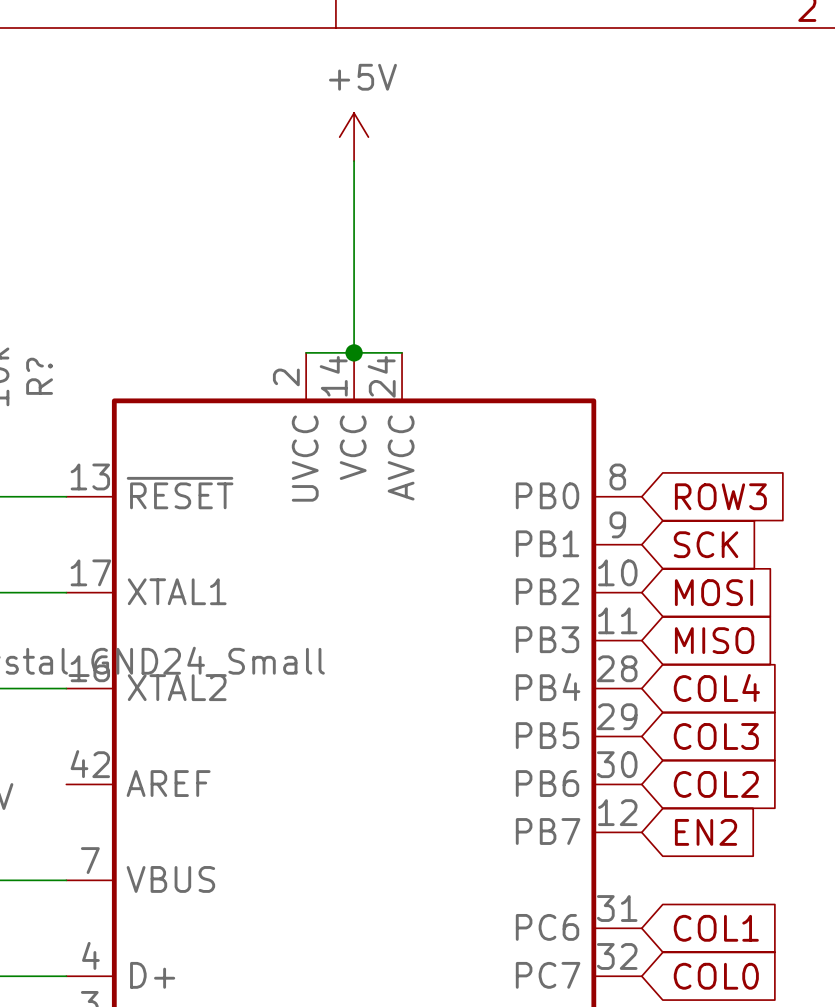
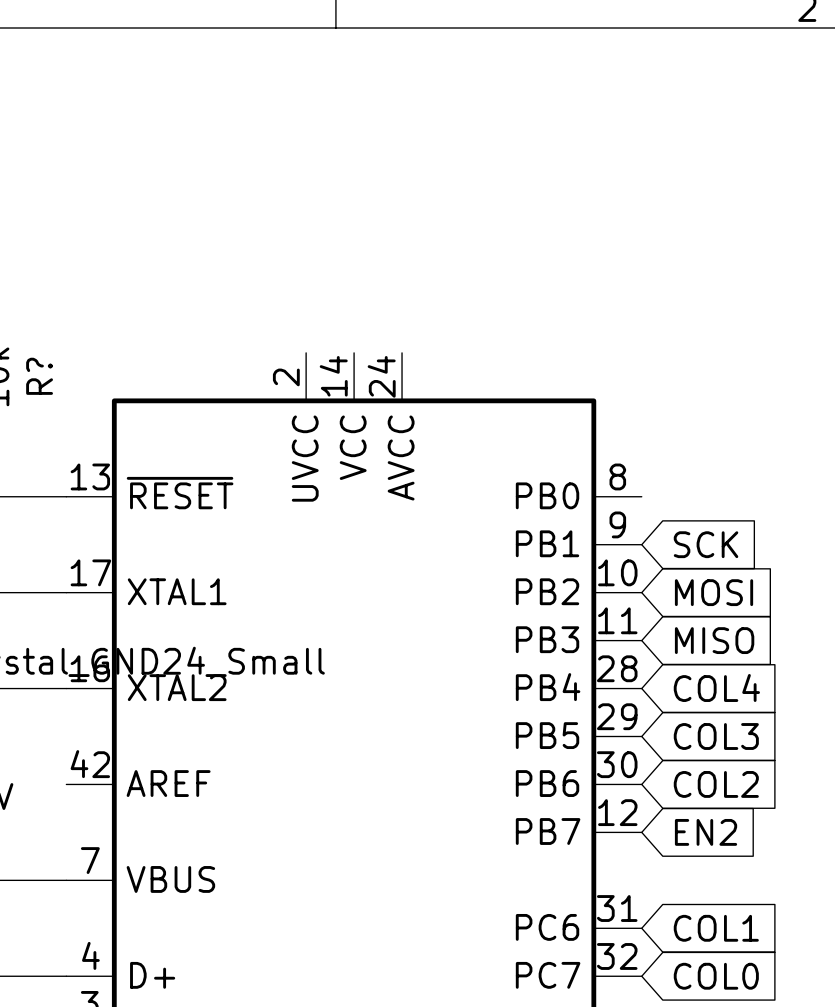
power symbol: +5V (354, 137) -> none
wire: (354, 161) (354, 352) -> none
wire: (306, 352) (402, 352) -> none
junction: (354, 352) -> none
global label: ROW3 (720, 496) -> none

